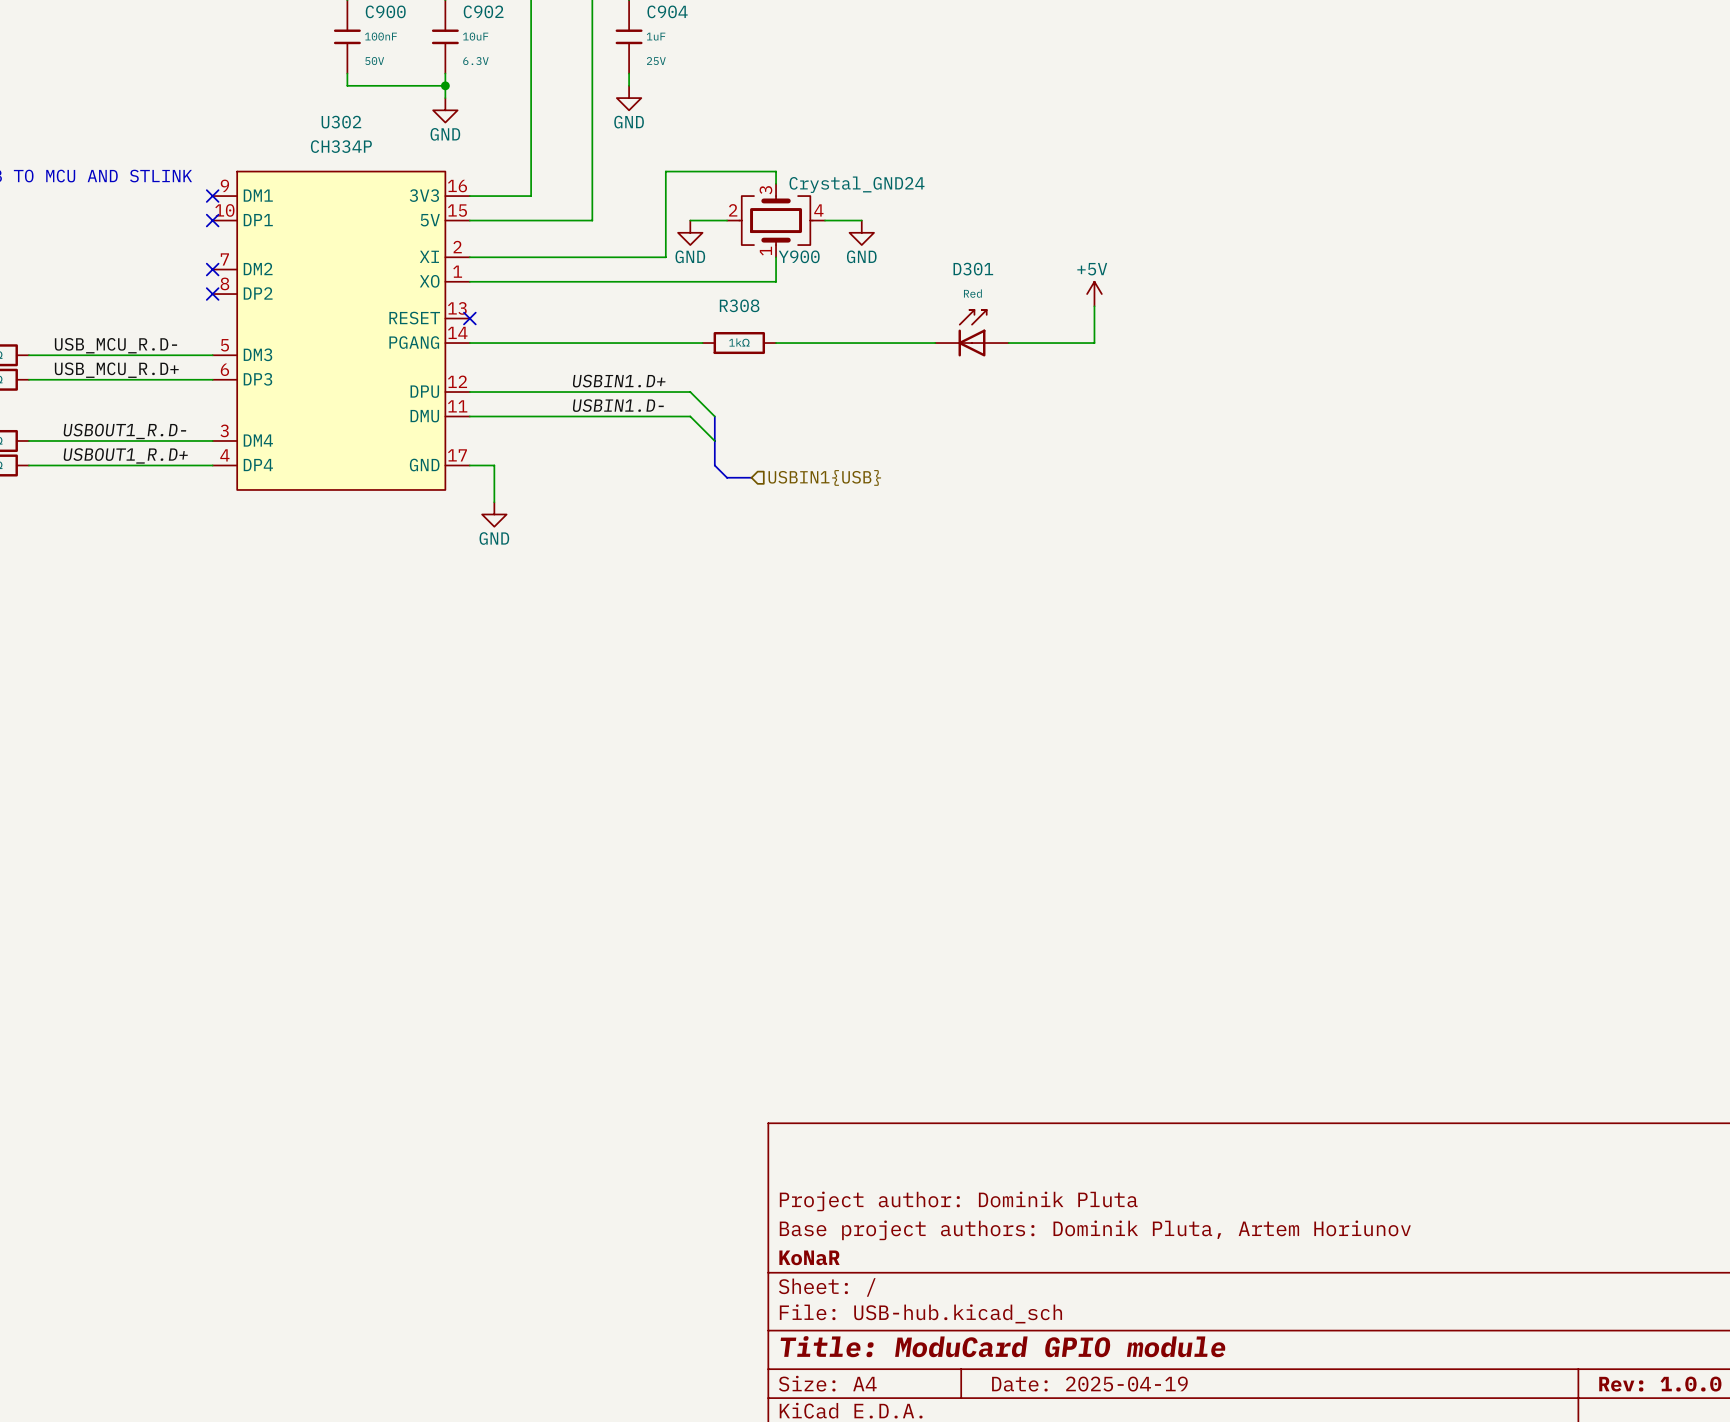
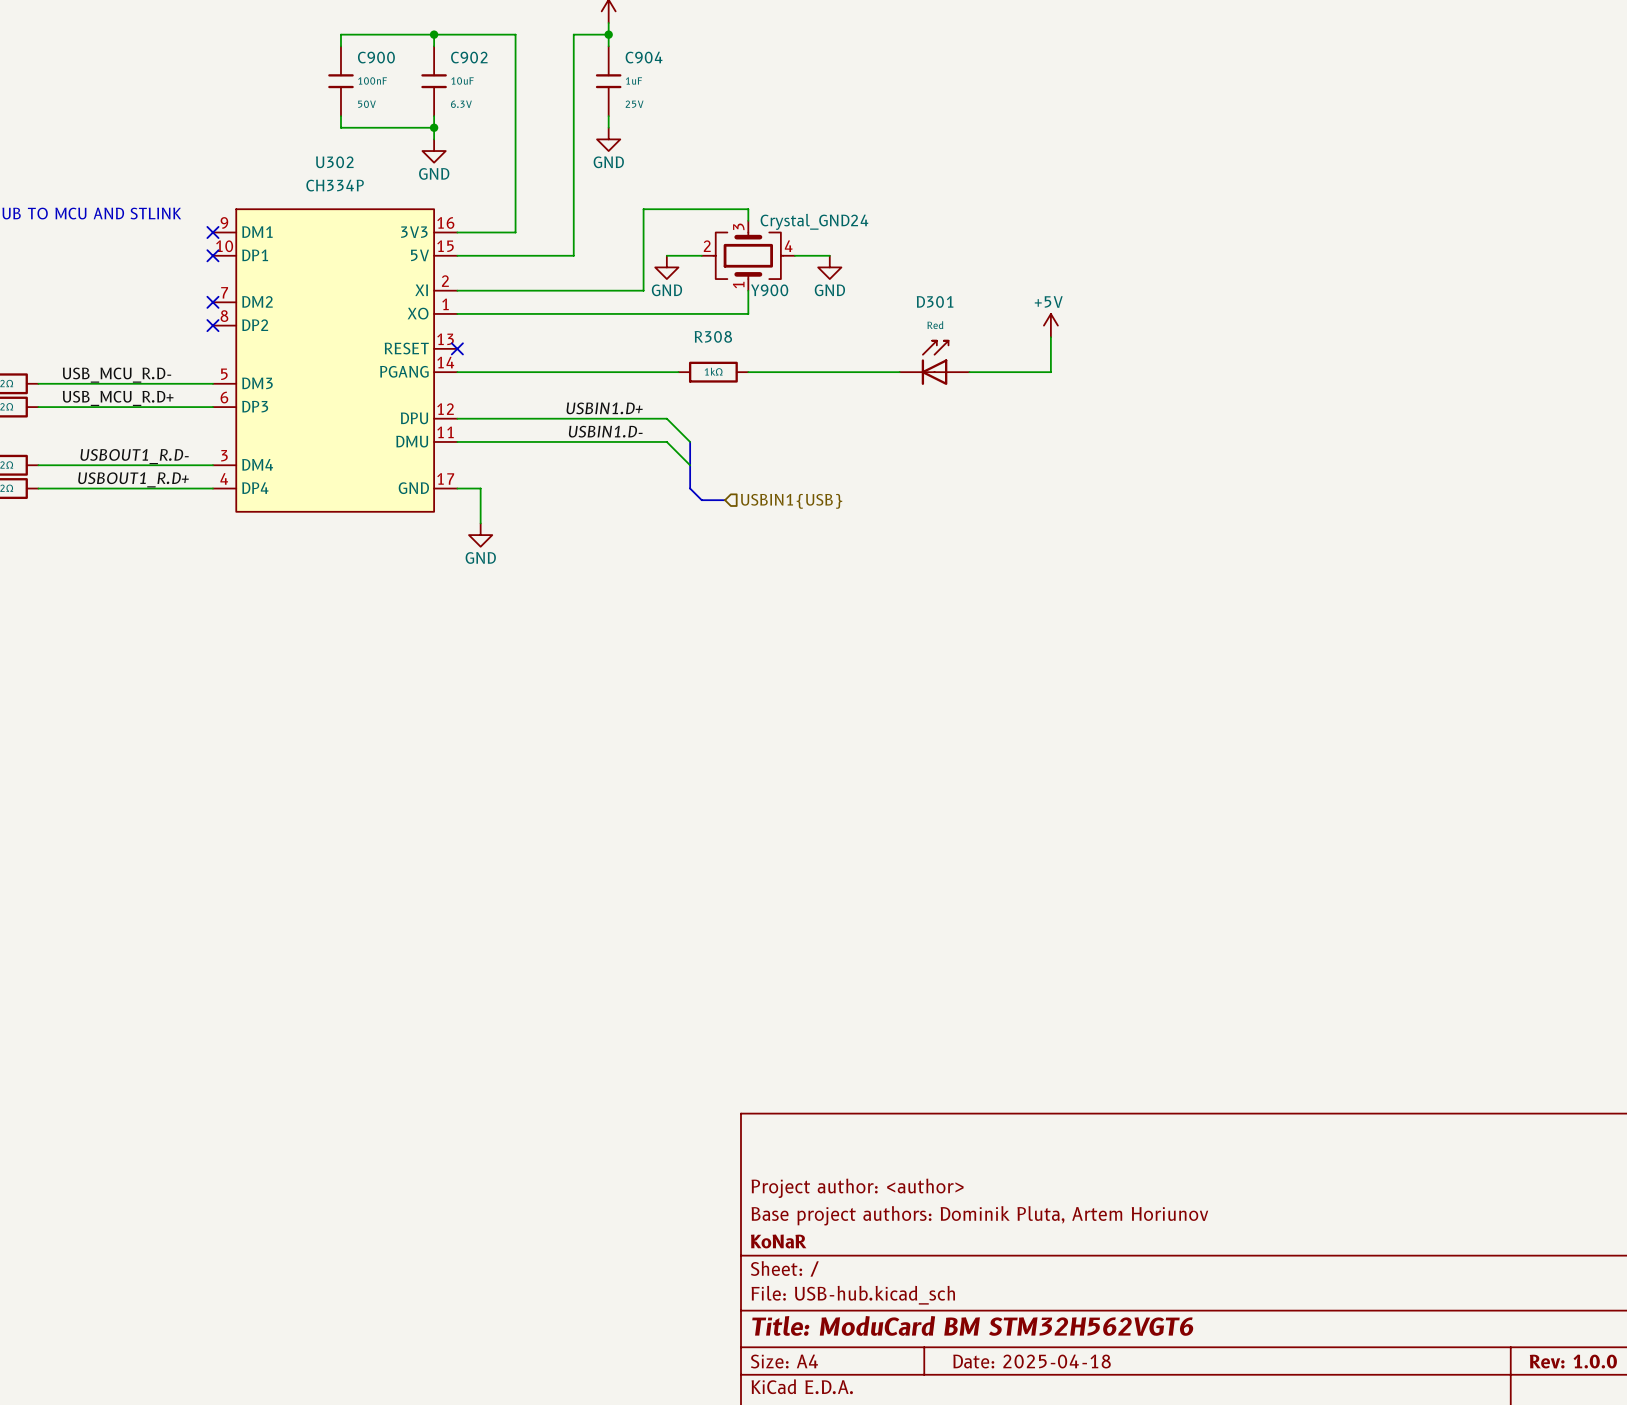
title block: Project author: Dominik Pluta (958, 1201) -> Project author: <author> (857, 1188)
title block: Title: ModuCard GPIO module (1002, 1346) -> Title: ModuCard BM STM32H562VGT6 (972, 1325)
title block: Date: 2025-04-19 (1089, 1384) -> Date: 2025-04-18 (1032, 1361)

